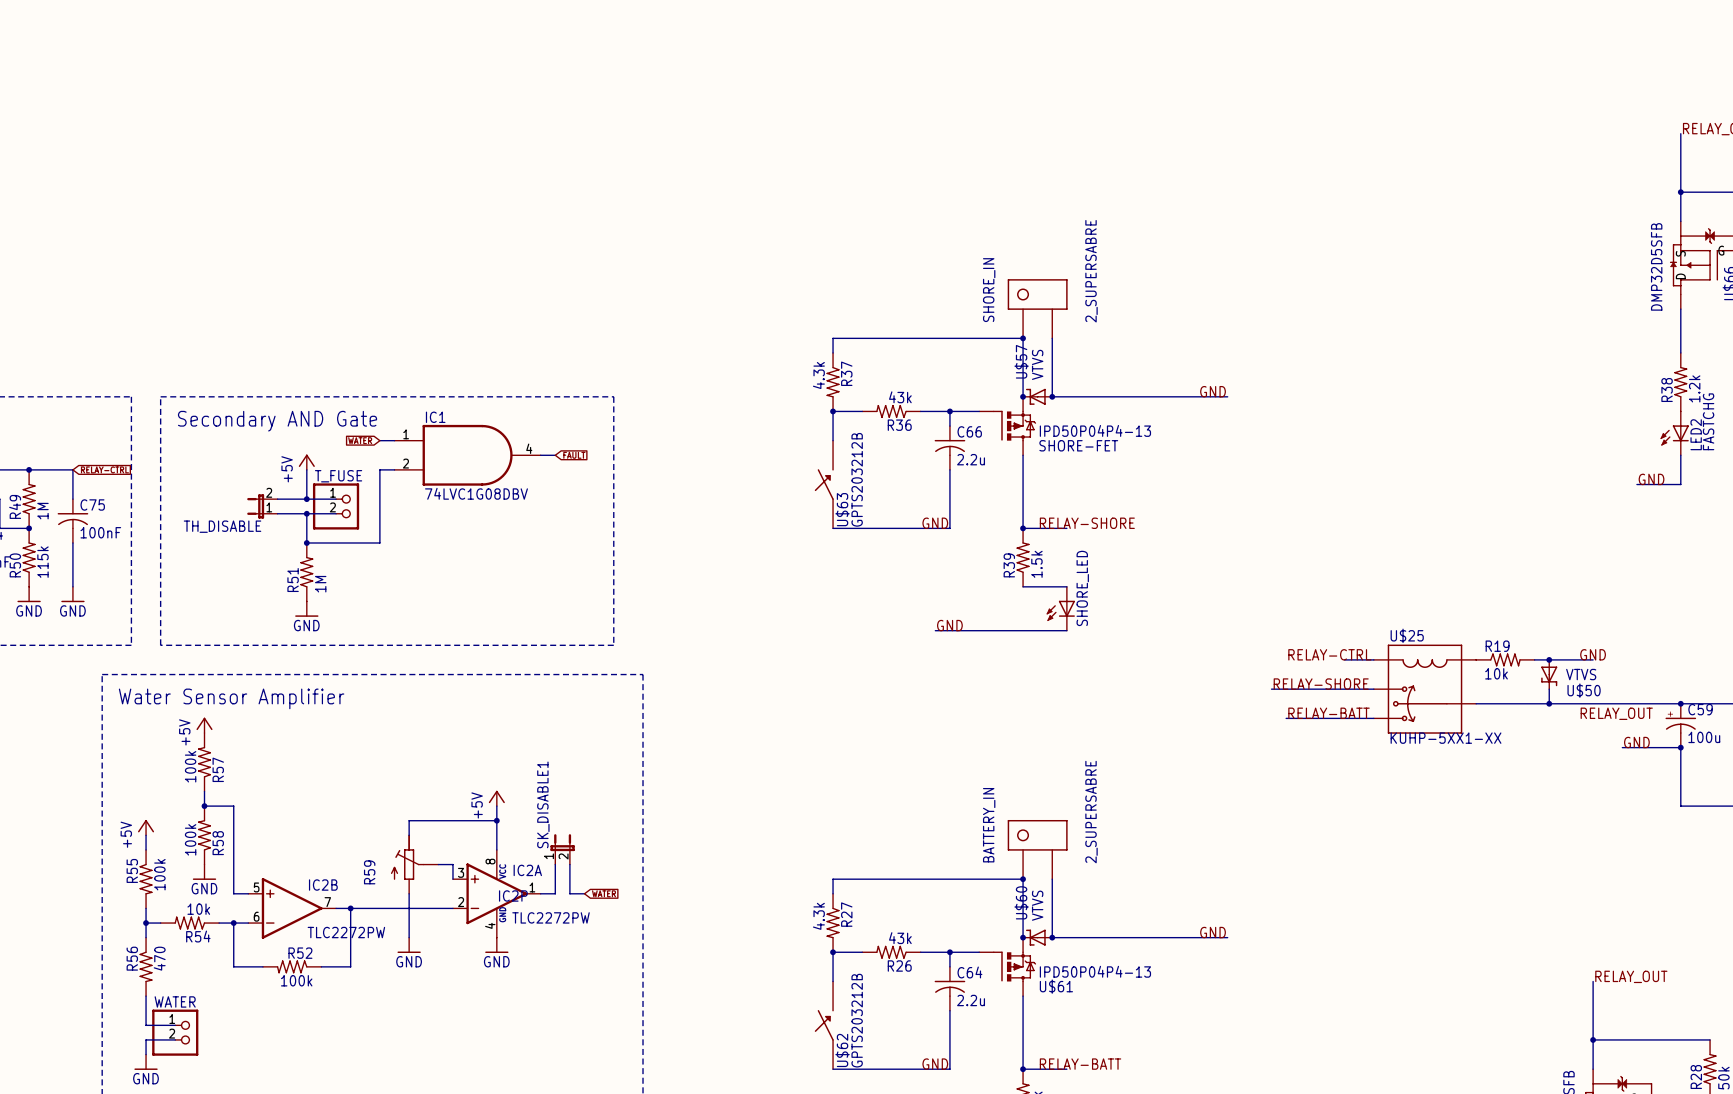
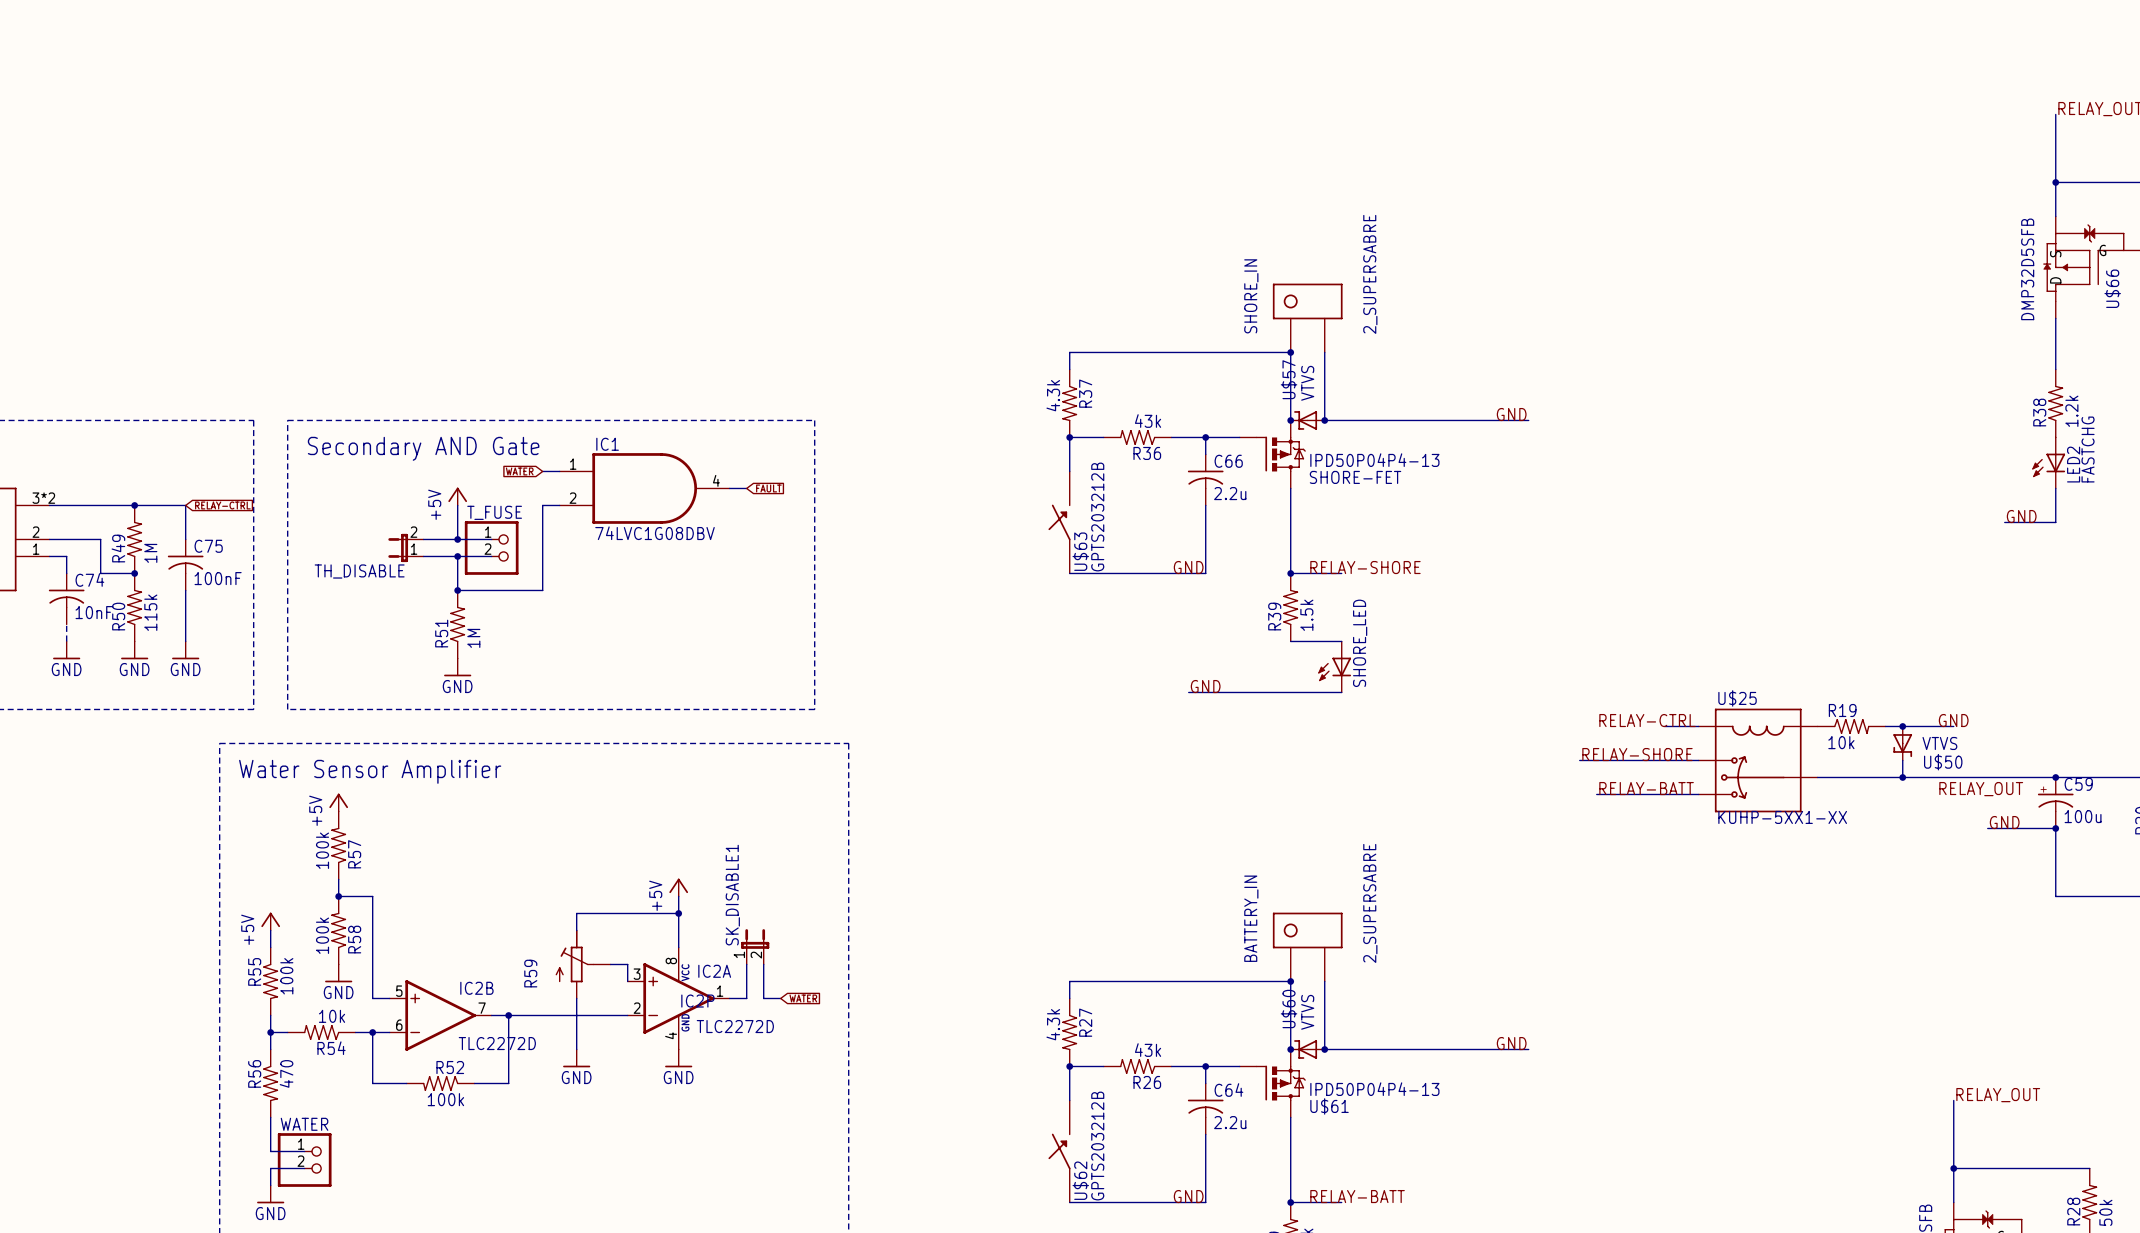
IC2A value: TLC2272PW (551, 917) -> TLC2272D (735, 1026)
IC2B value: TLC2272PW (346, 932) -> TLC2272D (497, 1043)

